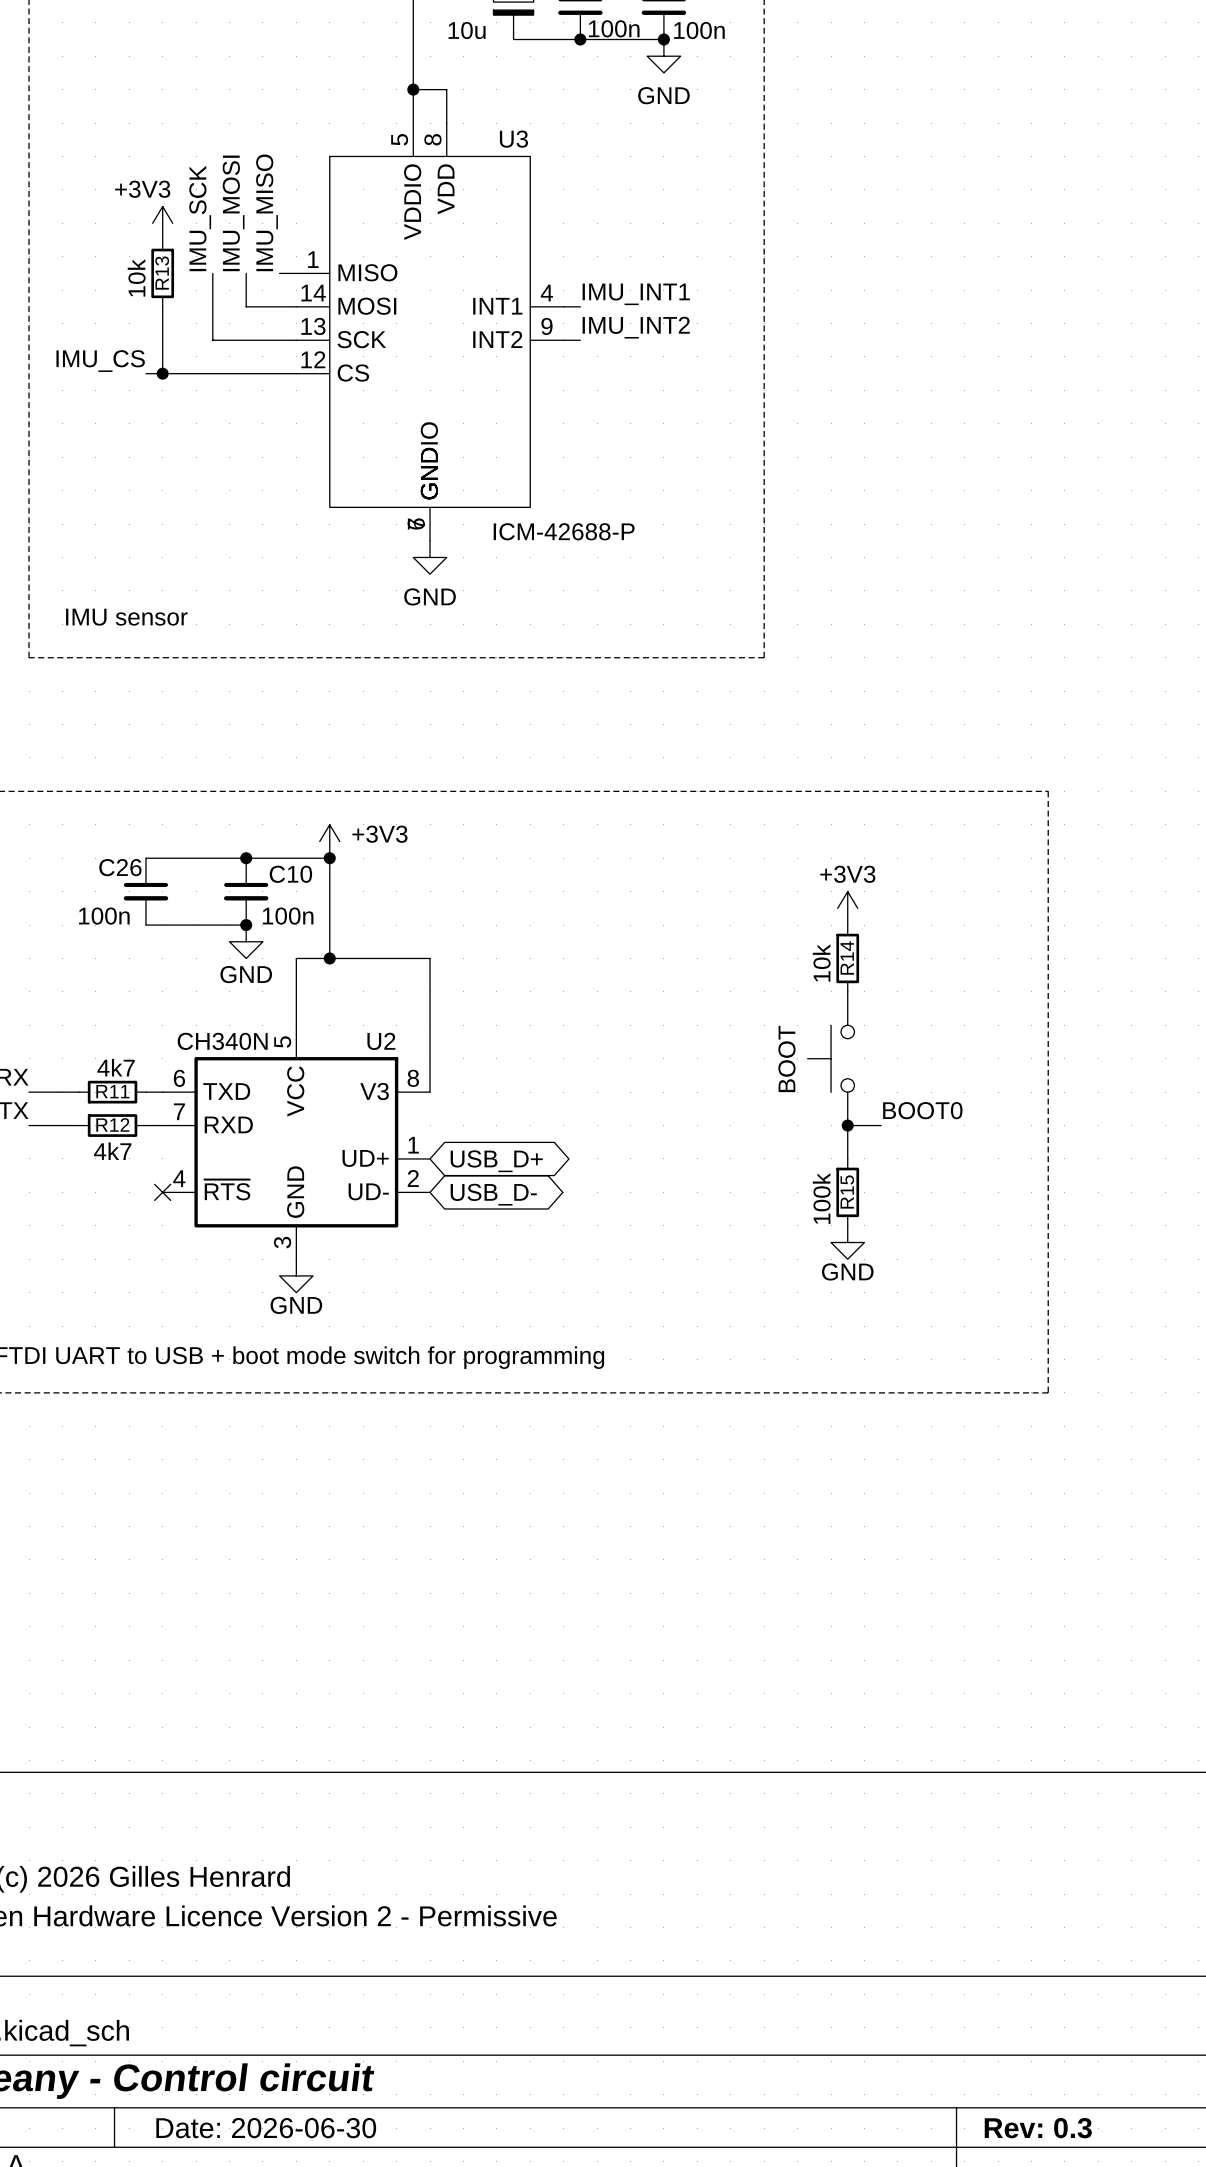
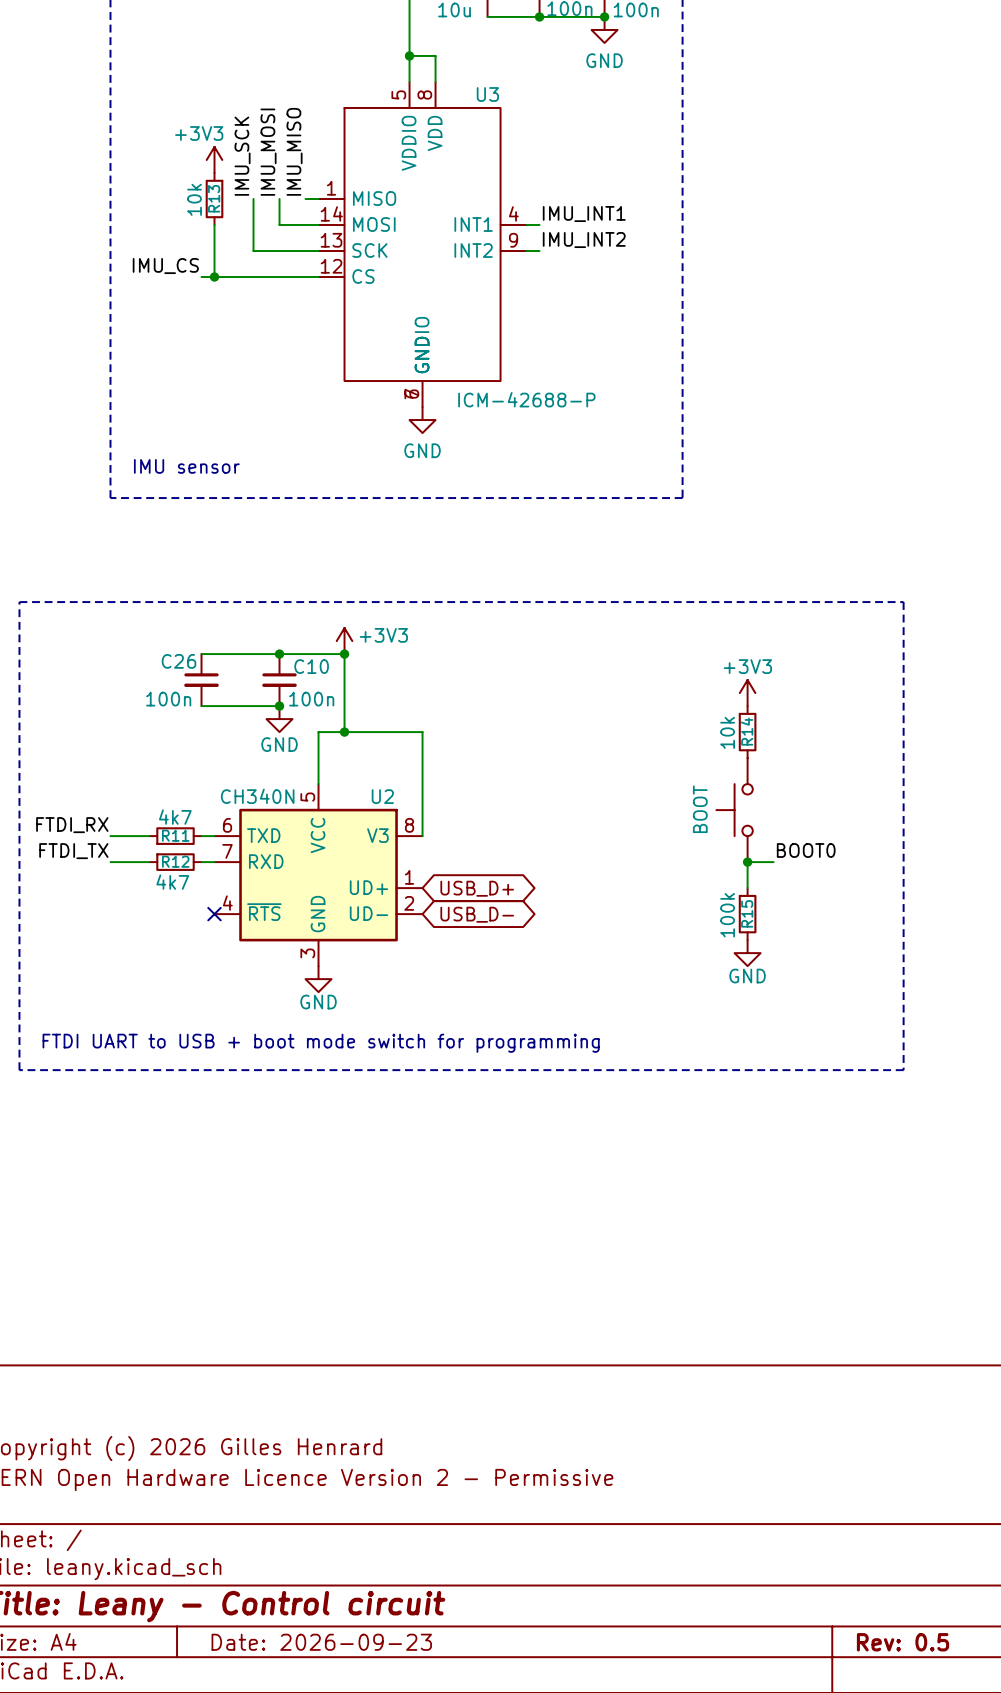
title block: Date: 2026-06-30 (266, 2128) -> Date: 2026-09-23 (321, 1642)
title block: Rev: 0.3 (1038, 2128) -> Rev: 0.5 (903, 1642)

